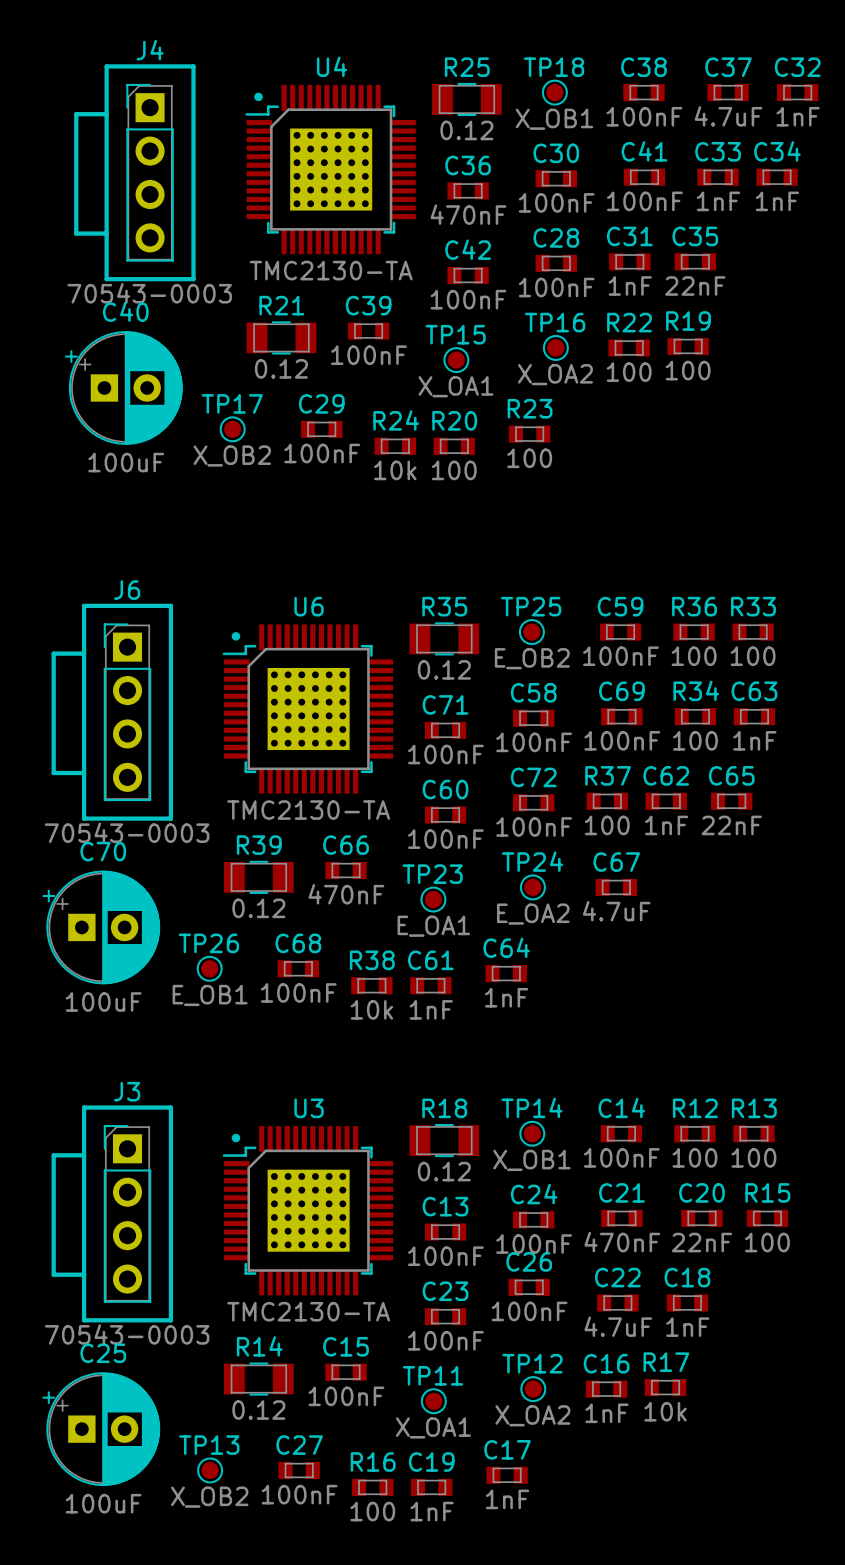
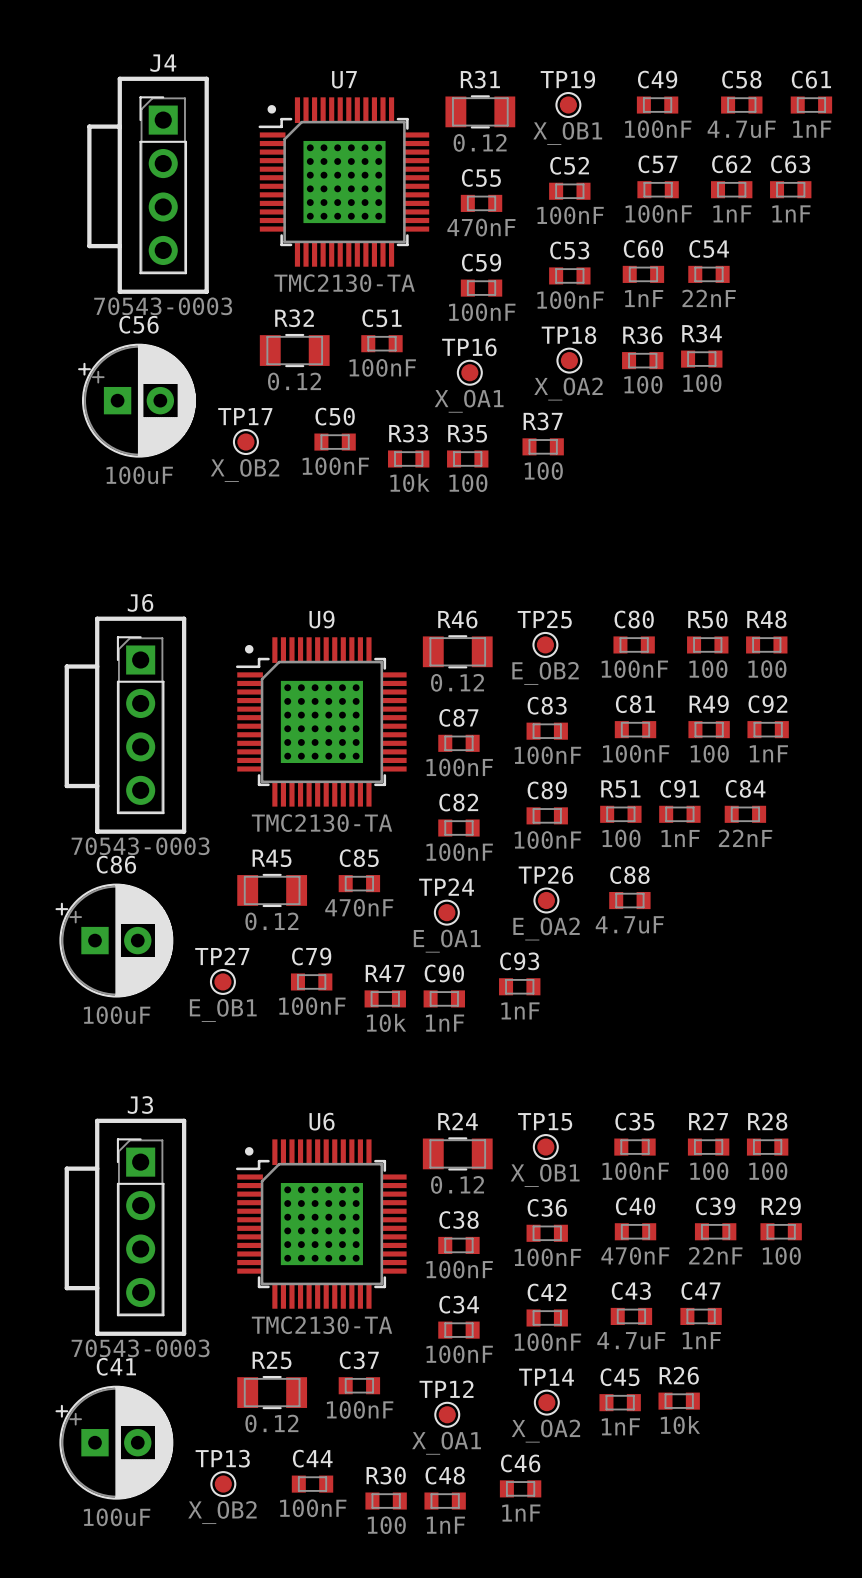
U4 name: U4 (331, 66) -> U7 (344, 79)
R25 name: R25 (467, 67) -> R31 (480, 79)
TP18 name: TP18 (554, 67) -> TP19 (567, 79)
C38 name: C38 (643, 67) -> C49 (657, 79)
C37 name: C37 (728, 67) -> C58 (741, 79)
C32 name: C32 (797, 67) -> C61 (811, 79)
C41 name: C41 (644, 151) -> C57 (658, 164)
C33 name: C33 (718, 151) -> C62 (731, 164)
C34 name: C34 (777, 151) -> C63 (790, 164)
C30 name: C30 (556, 153) -> C52 (569, 165)
C36 name: C36 (468, 165) -> C55 (481, 177)
C31 name: C31 (629, 236) -> C60 (643, 248)
C35 name: C35 (695, 236) -> C54 (709, 248)
C28 name: C28 (556, 237) -> C53 (569, 250)
C42 name: C42 (468, 249) -> C59 (481, 262)
R21 name: R21 (281, 305) -> R32 (294, 318)
C39 name: C39 (368, 305) -> C51 (381, 318)
C40 name: C40 (125, 311) -> C56 (139, 324)
R19 name: R19 (688, 321) -> R34 (702, 333)
TP16 name: TP16 (555, 322) -> TP18 (568, 335)
R22 name: R22 (629, 322) -> R36 (642, 335)
TP15 name: TP15 (455, 334) -> TP16 (469, 347)
C29 name: C29 (321, 403) -> C50 (335, 416)
R23 name: R23 (530, 408) -> R37 (543, 421)
R24 name: R24 (396, 420) -> R33 (408, 433)
R20 name: R20 (454, 420) -> R35 (467, 433)
U6 name: U6 (309, 606) -> U9 (321, 619)
R35 name: R35 (444, 606) -> R46 (457, 619)
C59 name: C59 (620, 606) -> C80 (634, 619)
R36 name: R36 (694, 606) -> R50 (707, 619)
R33 name: R33 (753, 606) -> R48 (766, 619)
R34 name: R34 (696, 690) -> R49 (709, 704)
C69 name: C69 (621, 691) -> C81 (635, 704)
C63 name: C63 (754, 691) -> C92 (767, 704)
C58 name: C58 (533, 692) -> C83 (547, 705)
C71 name: C71 (445, 704) -> C87 (458, 717)
R37 name: R37 (608, 775) -> R51 (620, 789)
C62 name: C62 (666, 775) -> C91 (679, 788)
C65 name: C65 (731, 775) -> C84 (745, 788)
C72 name: C72 (533, 777) -> C89 (547, 790)
C60 name: C60 (445, 789) -> C82 (458, 802)
R39 name: R39 (259, 845) -> R45 (272, 858)
C66 name: C66 (346, 845) -> C85 (359, 858)
C70 name: C70 (103, 851) -> C86 (116, 864)
TP24 name: TP24 (532, 861) -> TP26 (545, 875)
C67 name: C67 (616, 862) -> C88 (629, 875)
TP23 name: TP23 (432, 874) -> TP24 (446, 887)
TP26 name: TP26 (208, 943) -> TP27 (222, 956)
C68 name: C68 (298, 943) -> C79 (311, 956)
C64 name: C64 (506, 947) -> C93 (519, 961)
R38 name: R38 (372, 960) -> R47 (385, 973)
C61 name: C61 (430, 960) -> C90 (444, 973)
TP14 name: TP14 (531, 1107) -> TP15 (545, 1121)
C14 name: C14 (621, 1107) -> C35 (634, 1121)
U3 name: U3 (309, 1108) -> U6 (322, 1121)
R18 name: R18 (444, 1108) -> R24 (458, 1121)
R12 name: R12 (695, 1108) -> R27 (708, 1121)
R13 name: R13 (754, 1108) -> R28 (767, 1121)
C21 name: C21 (621, 1192) -> C40 (635, 1206)
C20 name: C20 (701, 1192) -> C39 (715, 1206)
R15 name: R15 (767, 1192) -> R29 (781, 1206)
C24 name: C24 (534, 1194) -> C36 (547, 1207)
C13 name: C13 (445, 1206) -> C38 (459, 1220)
C22 name: C22 (617, 1277) -> C43 (631, 1291)
C18 name: C18 (687, 1277) -> C47 (700, 1291)
C26: 100nF (529, 1287) -> none
C23 name: C23 (445, 1291) -> C34 (459, 1304)
C42: none -> 100nF (547, 1317)
R14 name: R14 (259, 1346) -> R25 (272, 1360)
C15 name: C15 (346, 1346) -> C37 (359, 1360)
C25 name: C25 (103, 1353) -> C41 (116, 1366)
R17 name: R17 (666, 1362) -> R26 (679, 1375)
TP12 name: TP12 (532, 1363) -> TP14 (546, 1377)
C16 name: C16 (606, 1363) -> C45 (620, 1377)
TP11 name: TP11 (433, 1375) -> TP12 (446, 1389)
C27 name: C27 (299, 1445) -> C44 (312, 1458)
C17 name: C17 (507, 1449) -> C46 (520, 1463)
R16 name: R16 (373, 1462) -> R30 (386, 1475)
C19 name: C19 (431, 1462) -> C48 (445, 1475)

